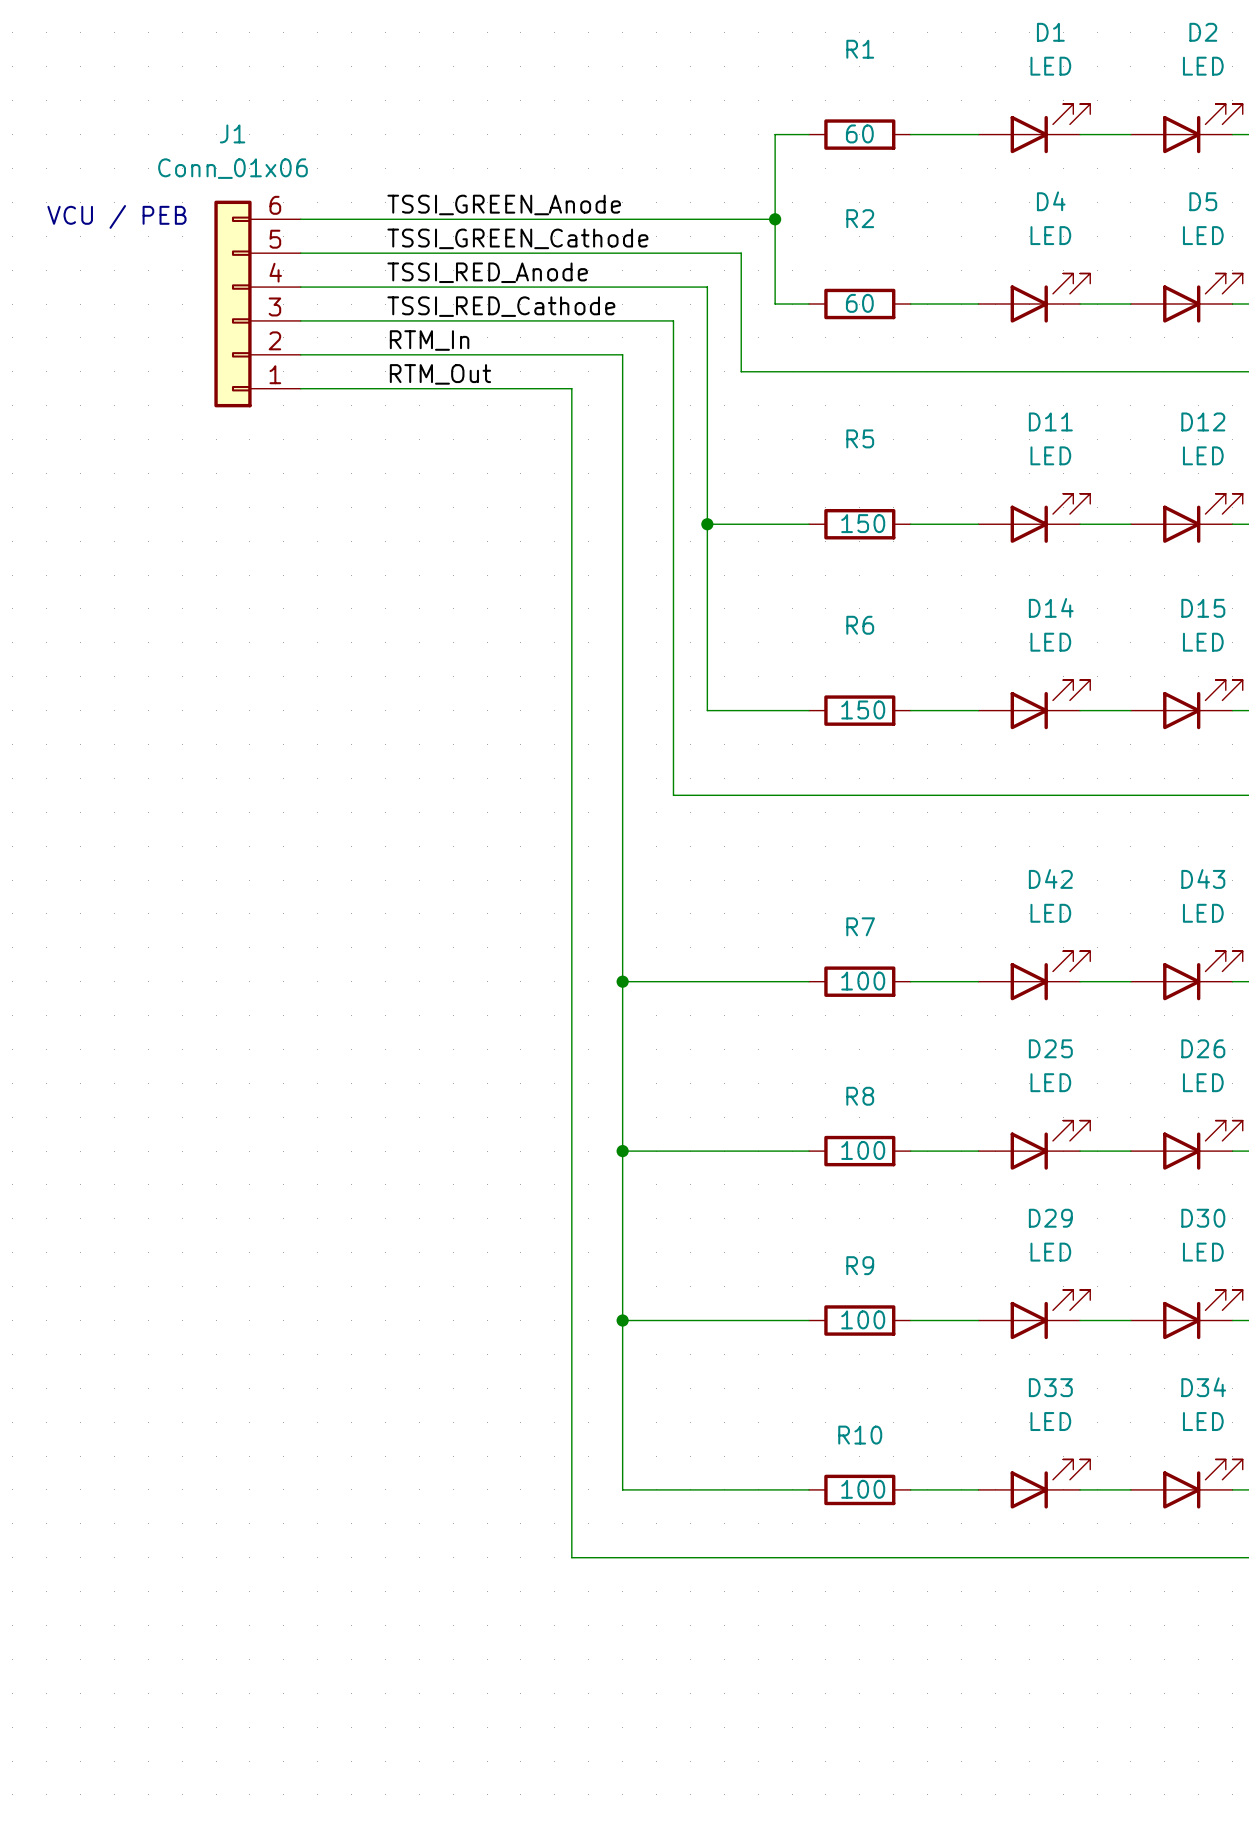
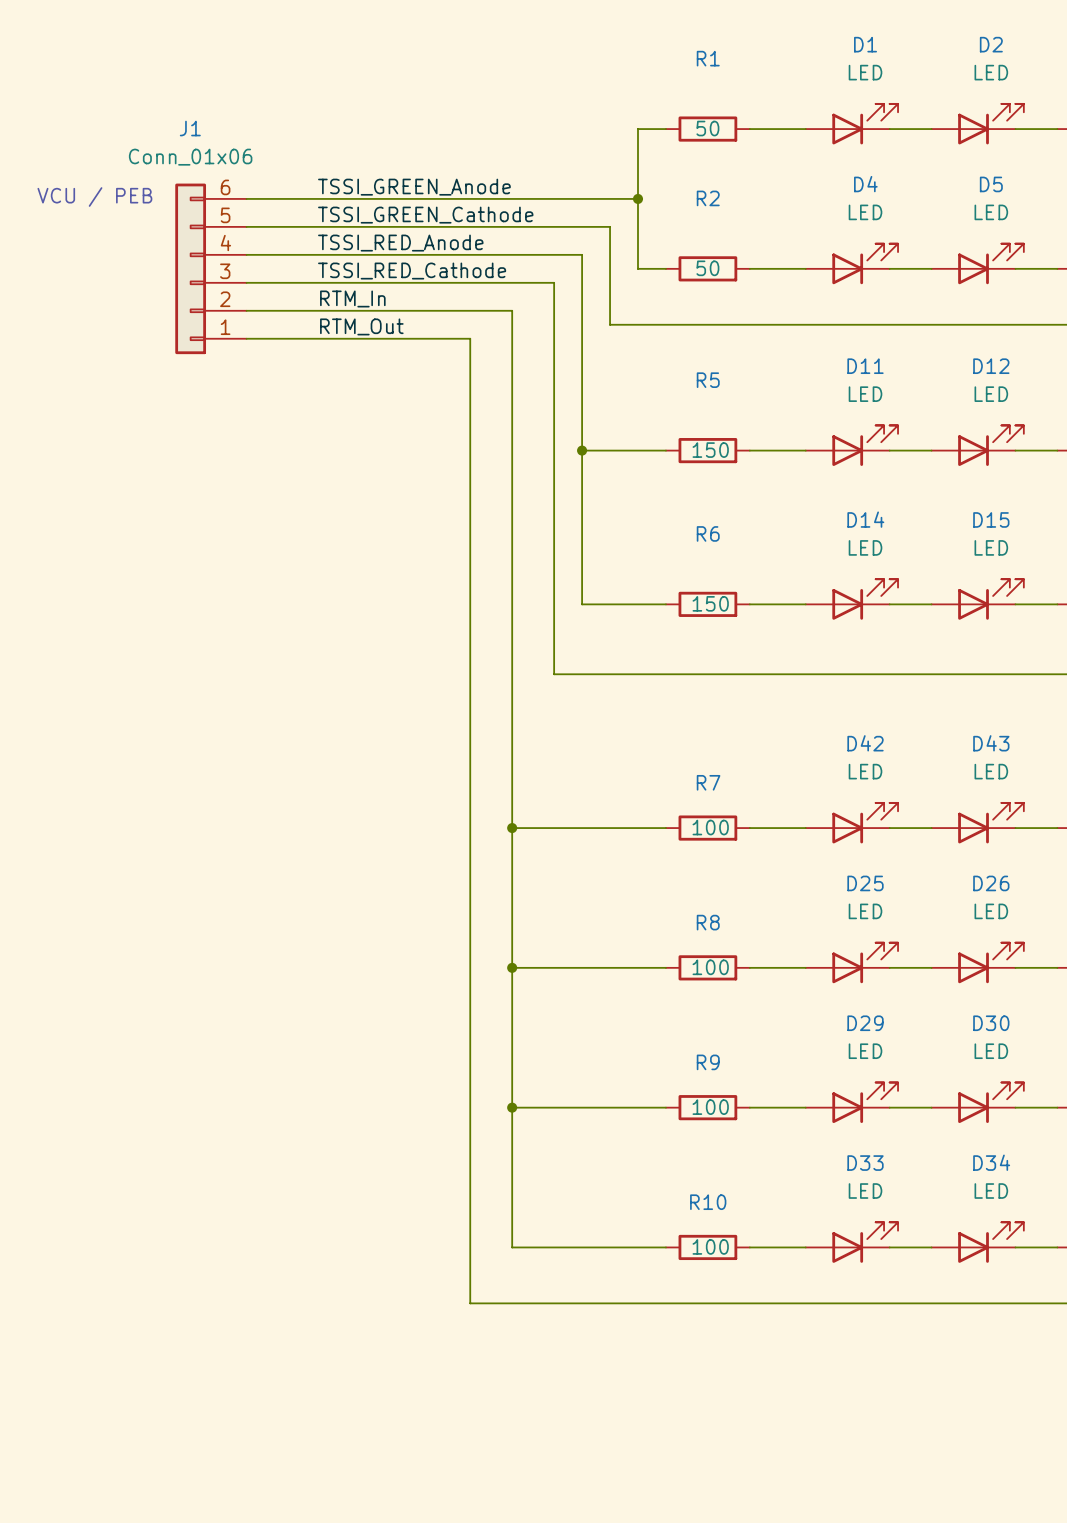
R1 value: 60 (859, 133) -> 50 (707, 128)
R2 value: 60 (859, 303) -> 50 (707, 268)

